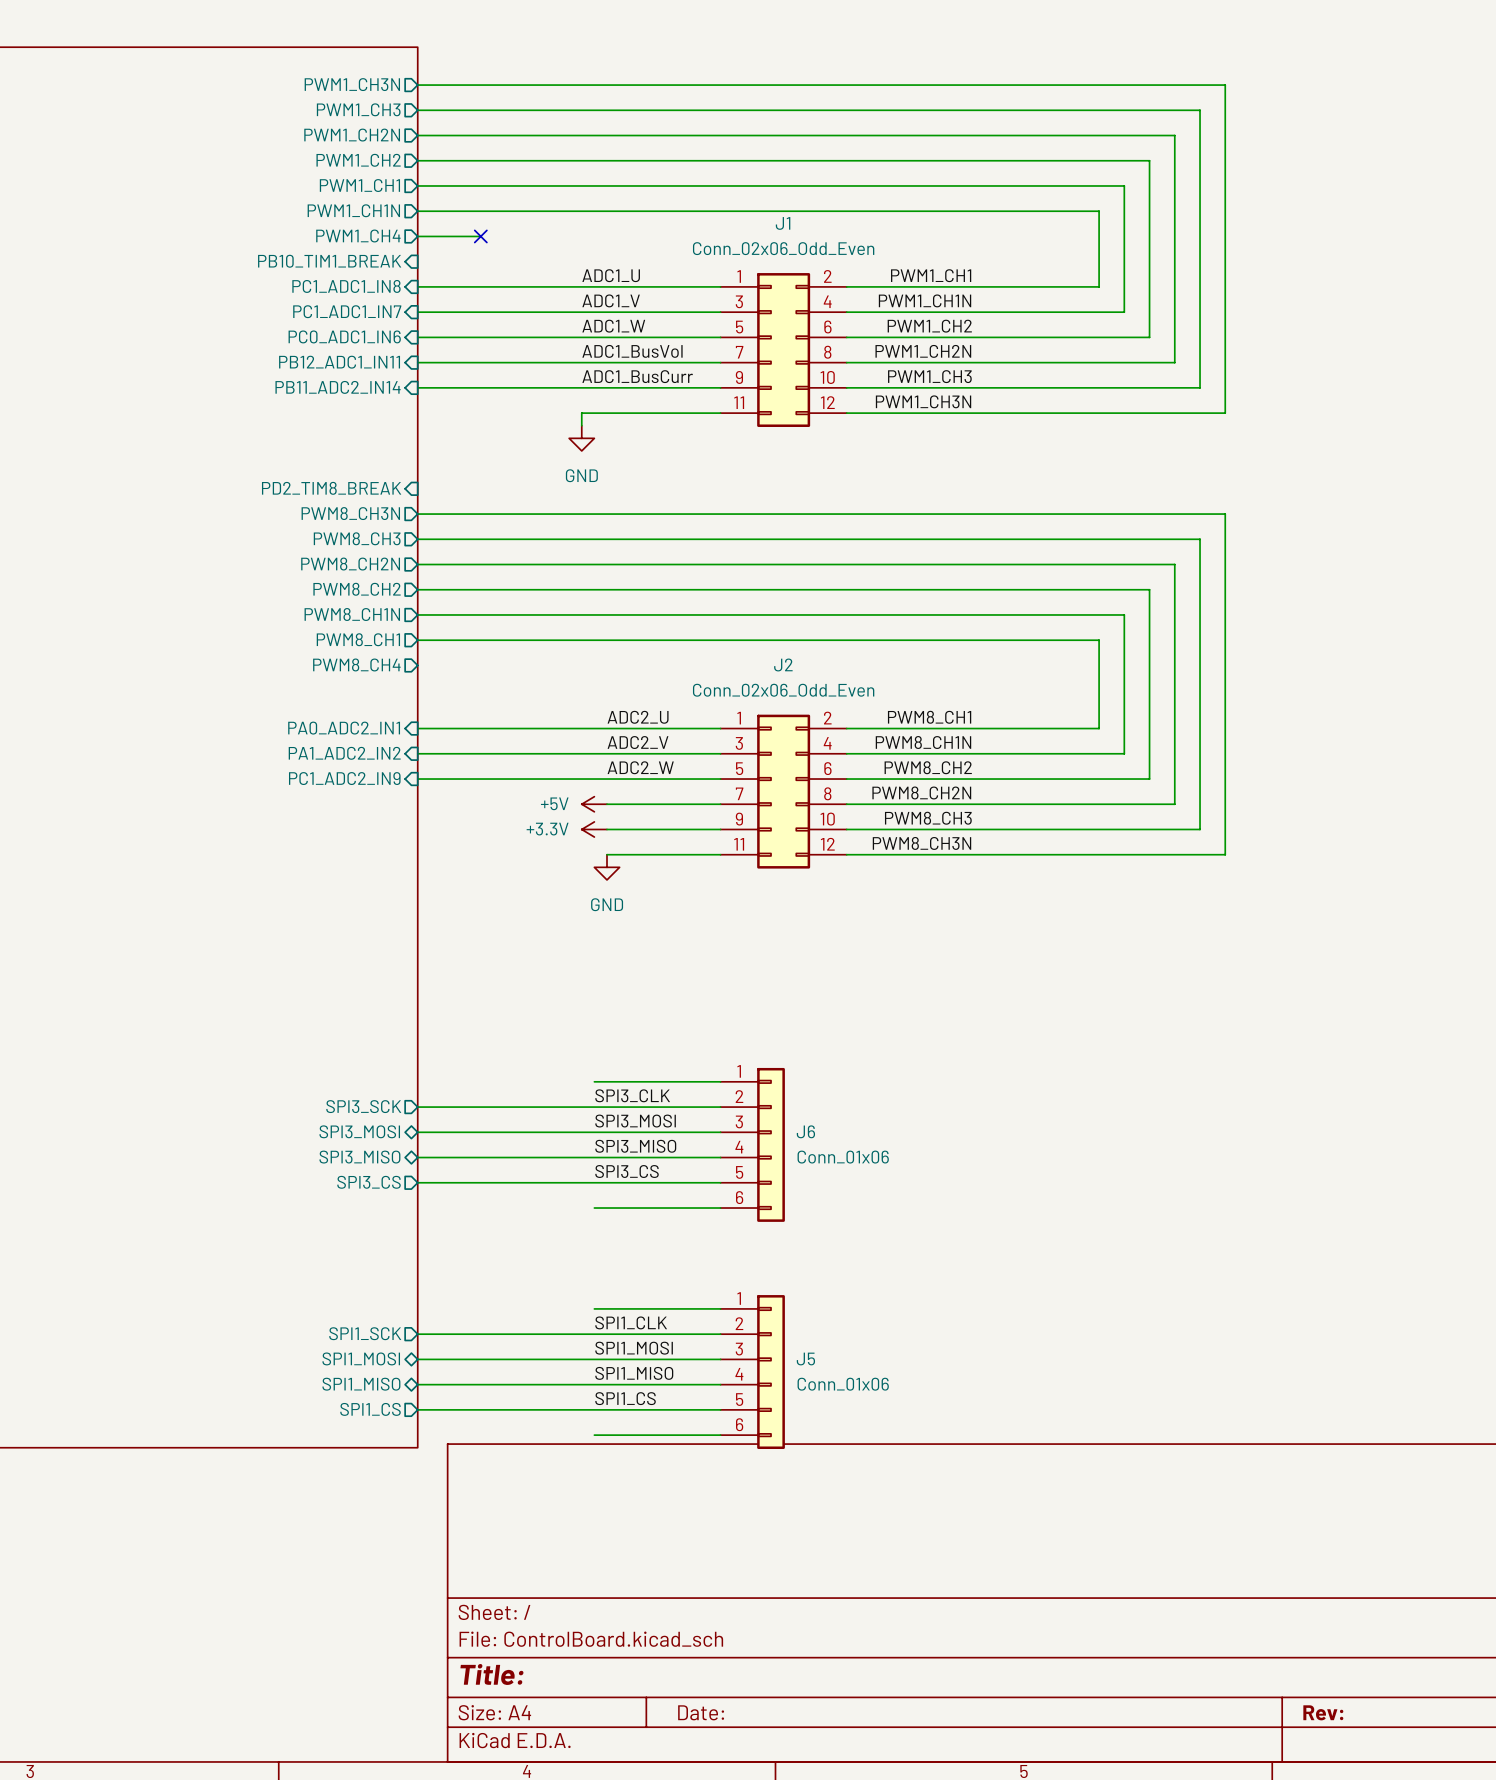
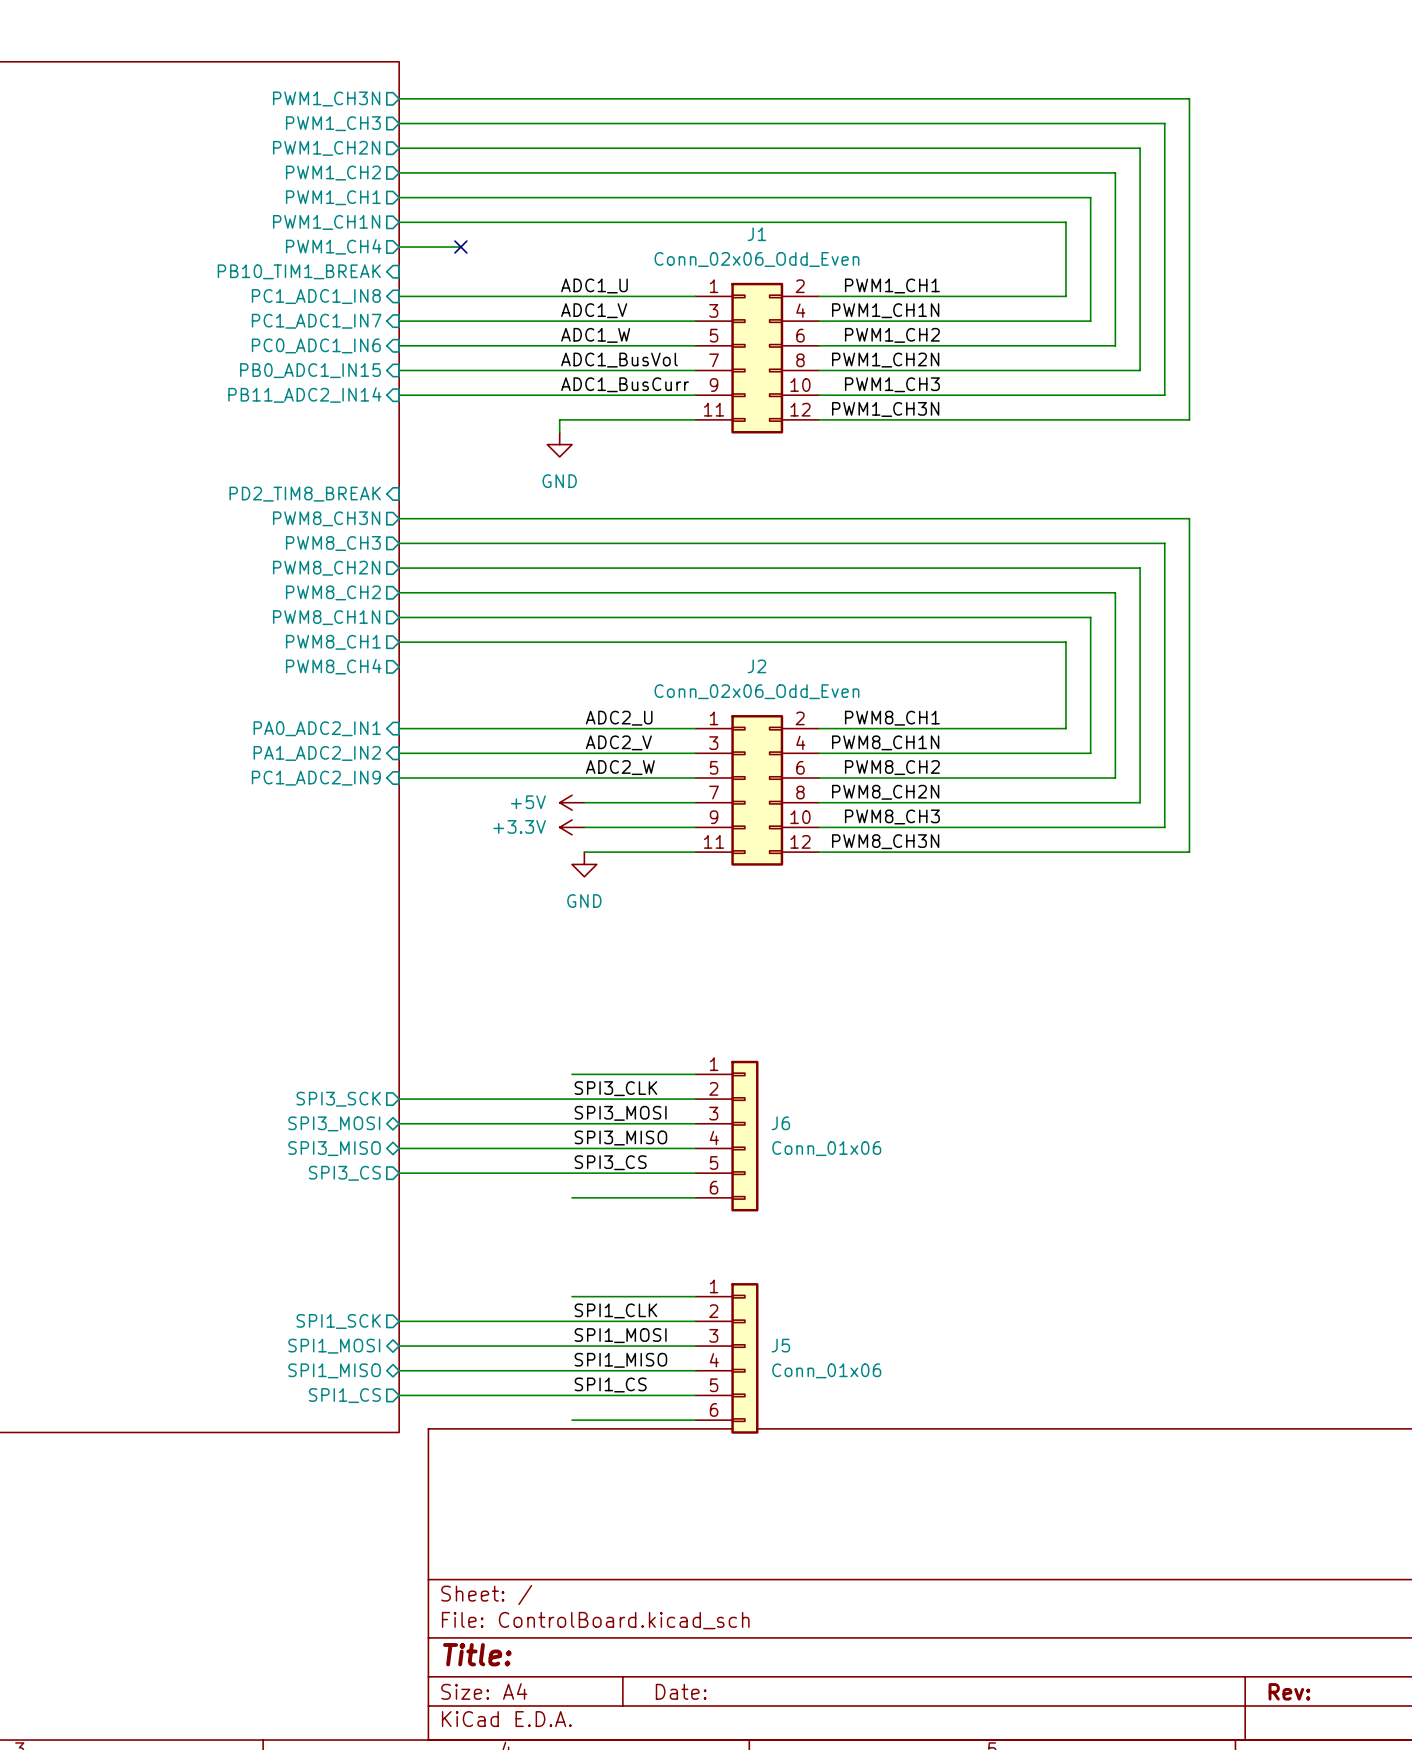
sheet pin: PB12_ADC1_IN11 (339, 362) -> PB0_ADC1_IN15 (310, 370)

